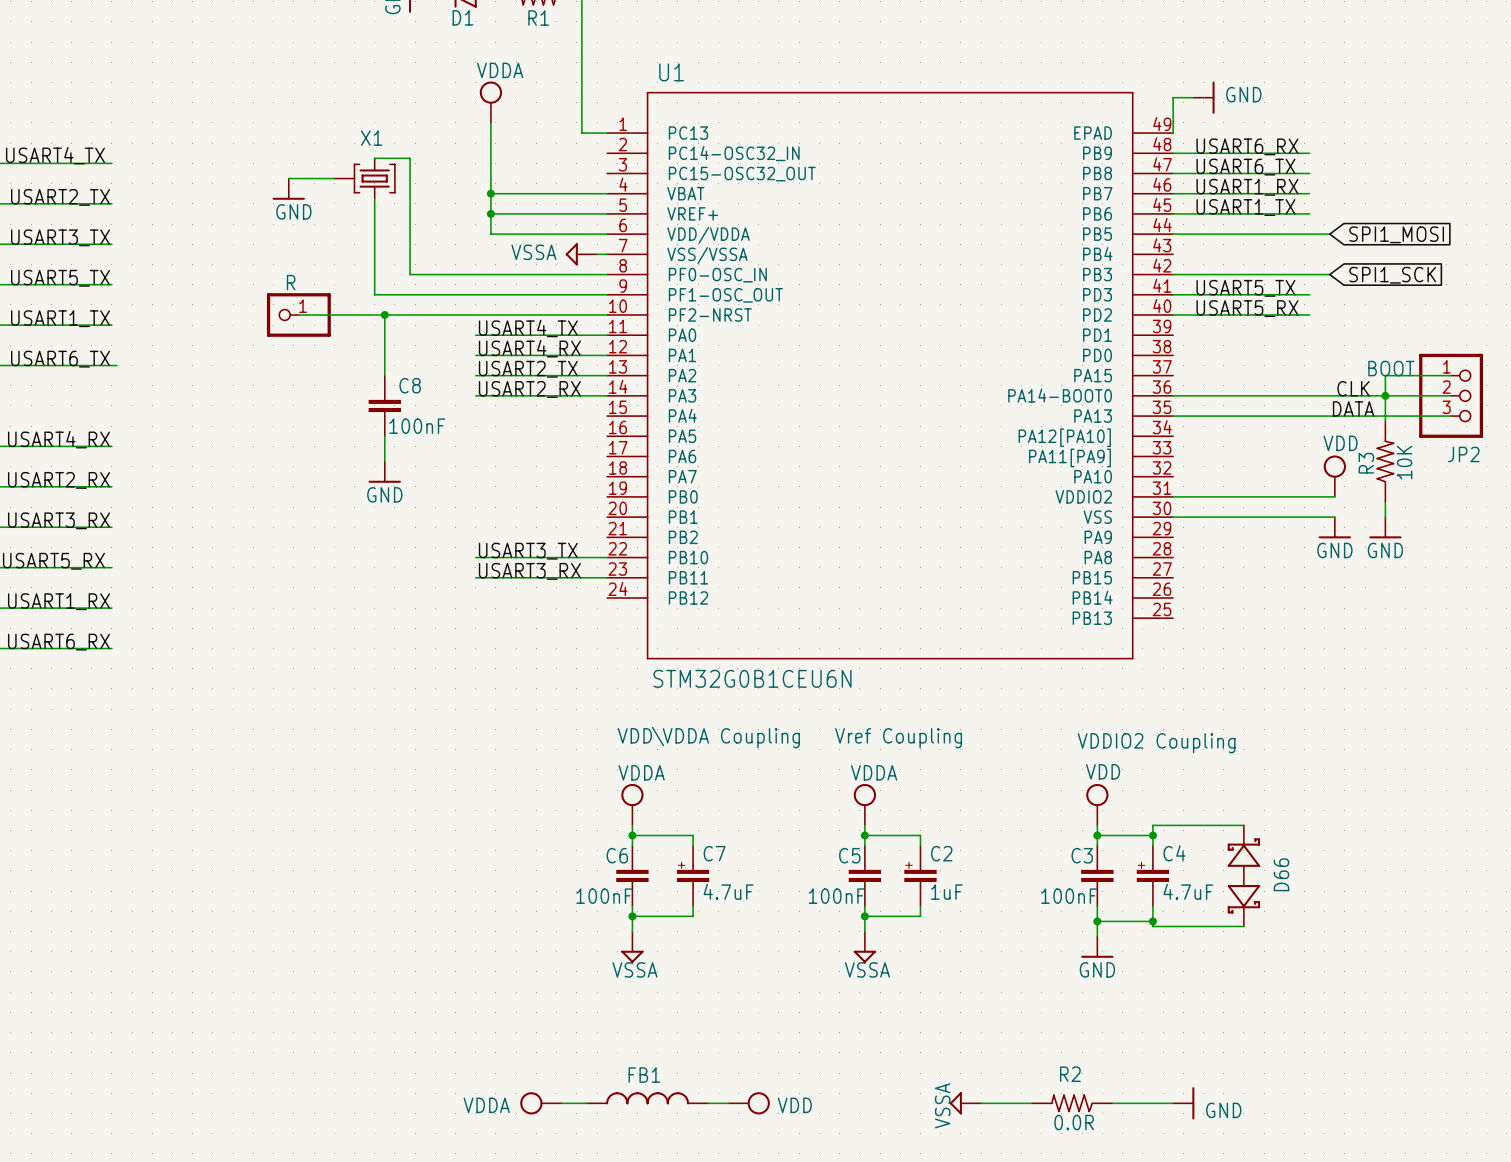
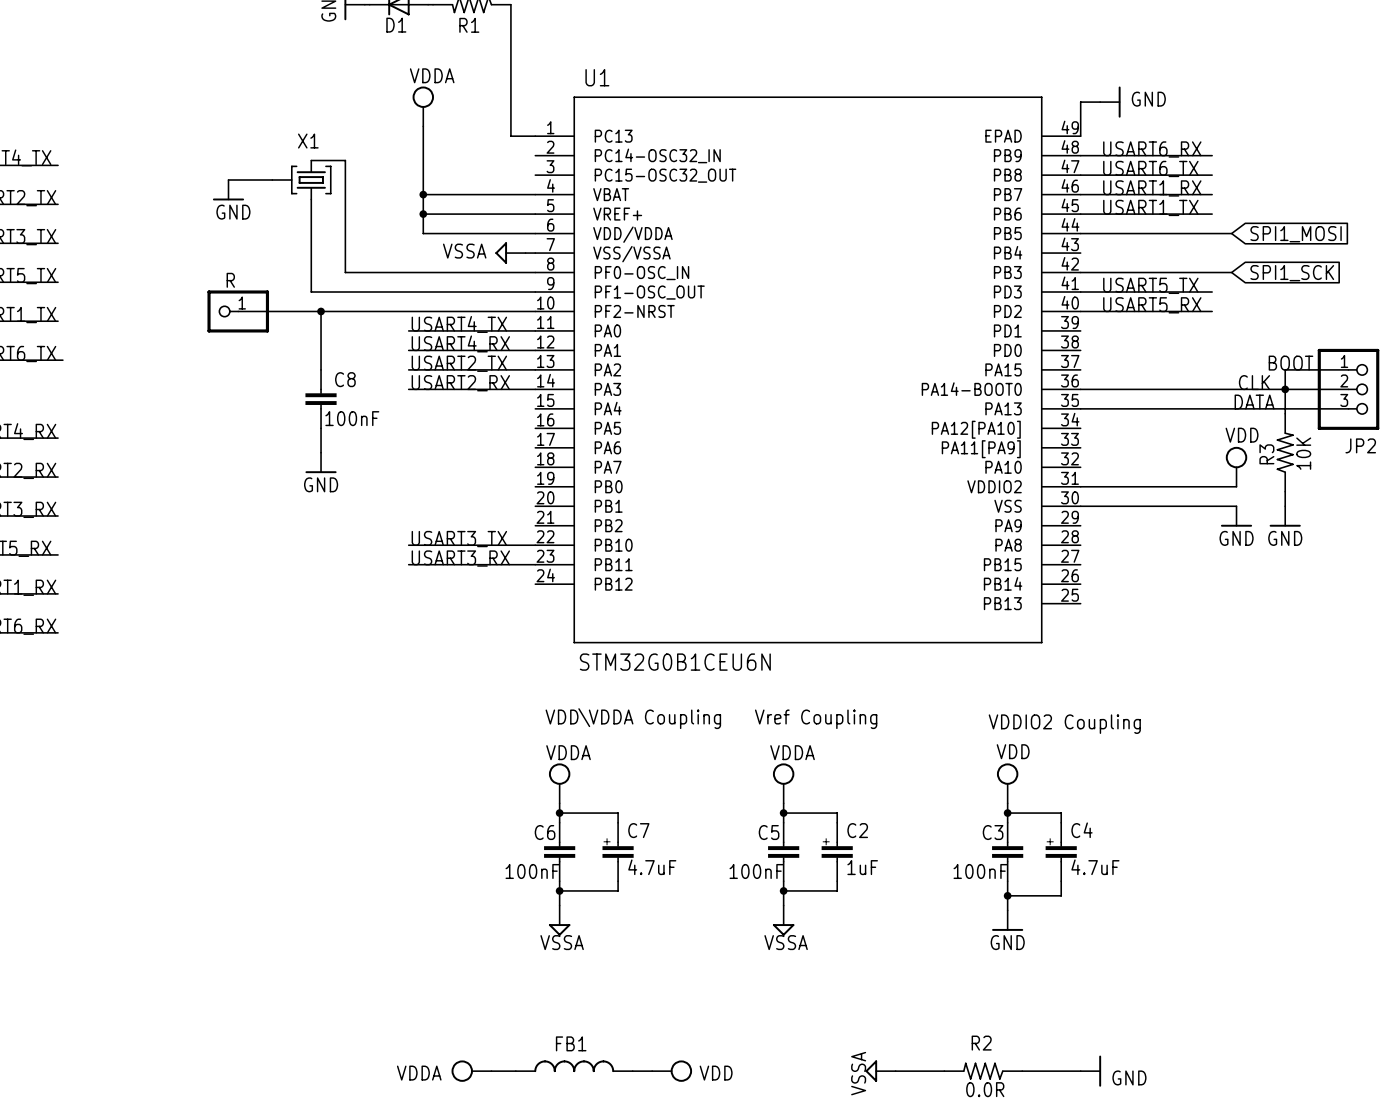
wire: (1243, 825) (1152, 825) (1152, 835) -> none
junction: (1152, 835) -> none
D66: (1243, 875) -> none
wire: (1152, 921) (1152, 926) (1243, 926) -> none
junction: (1152, 921) -> none

